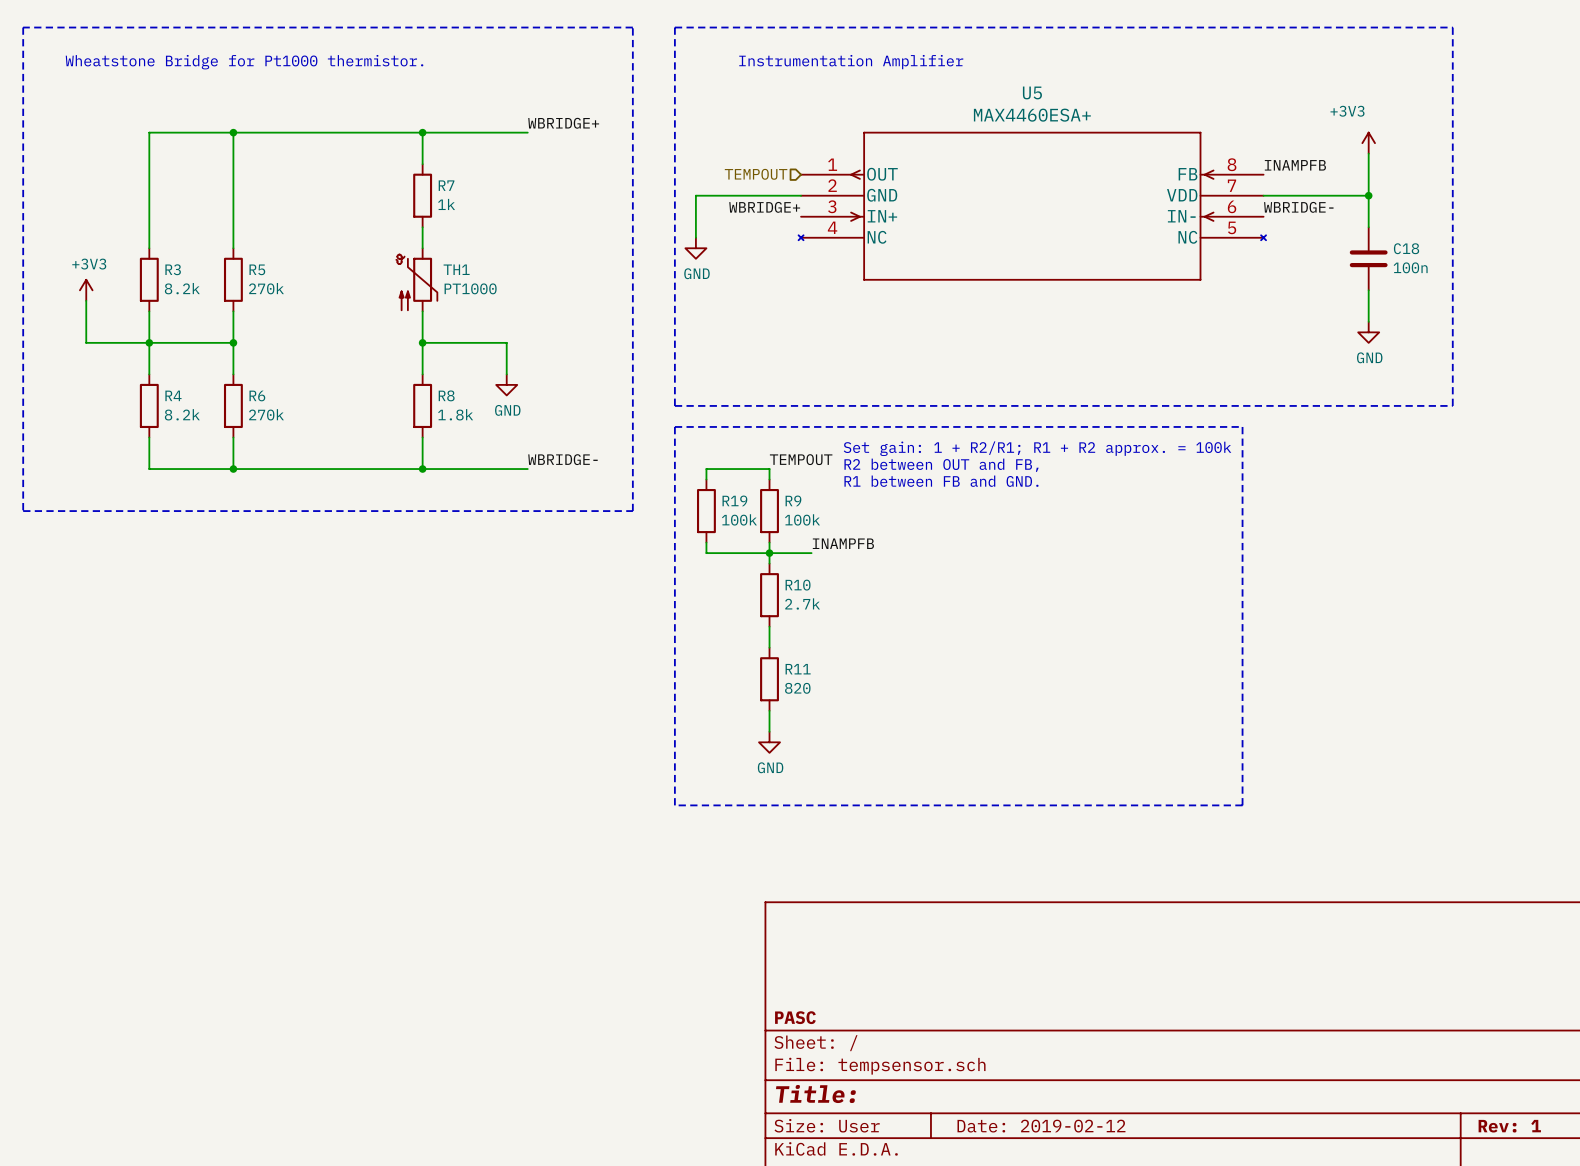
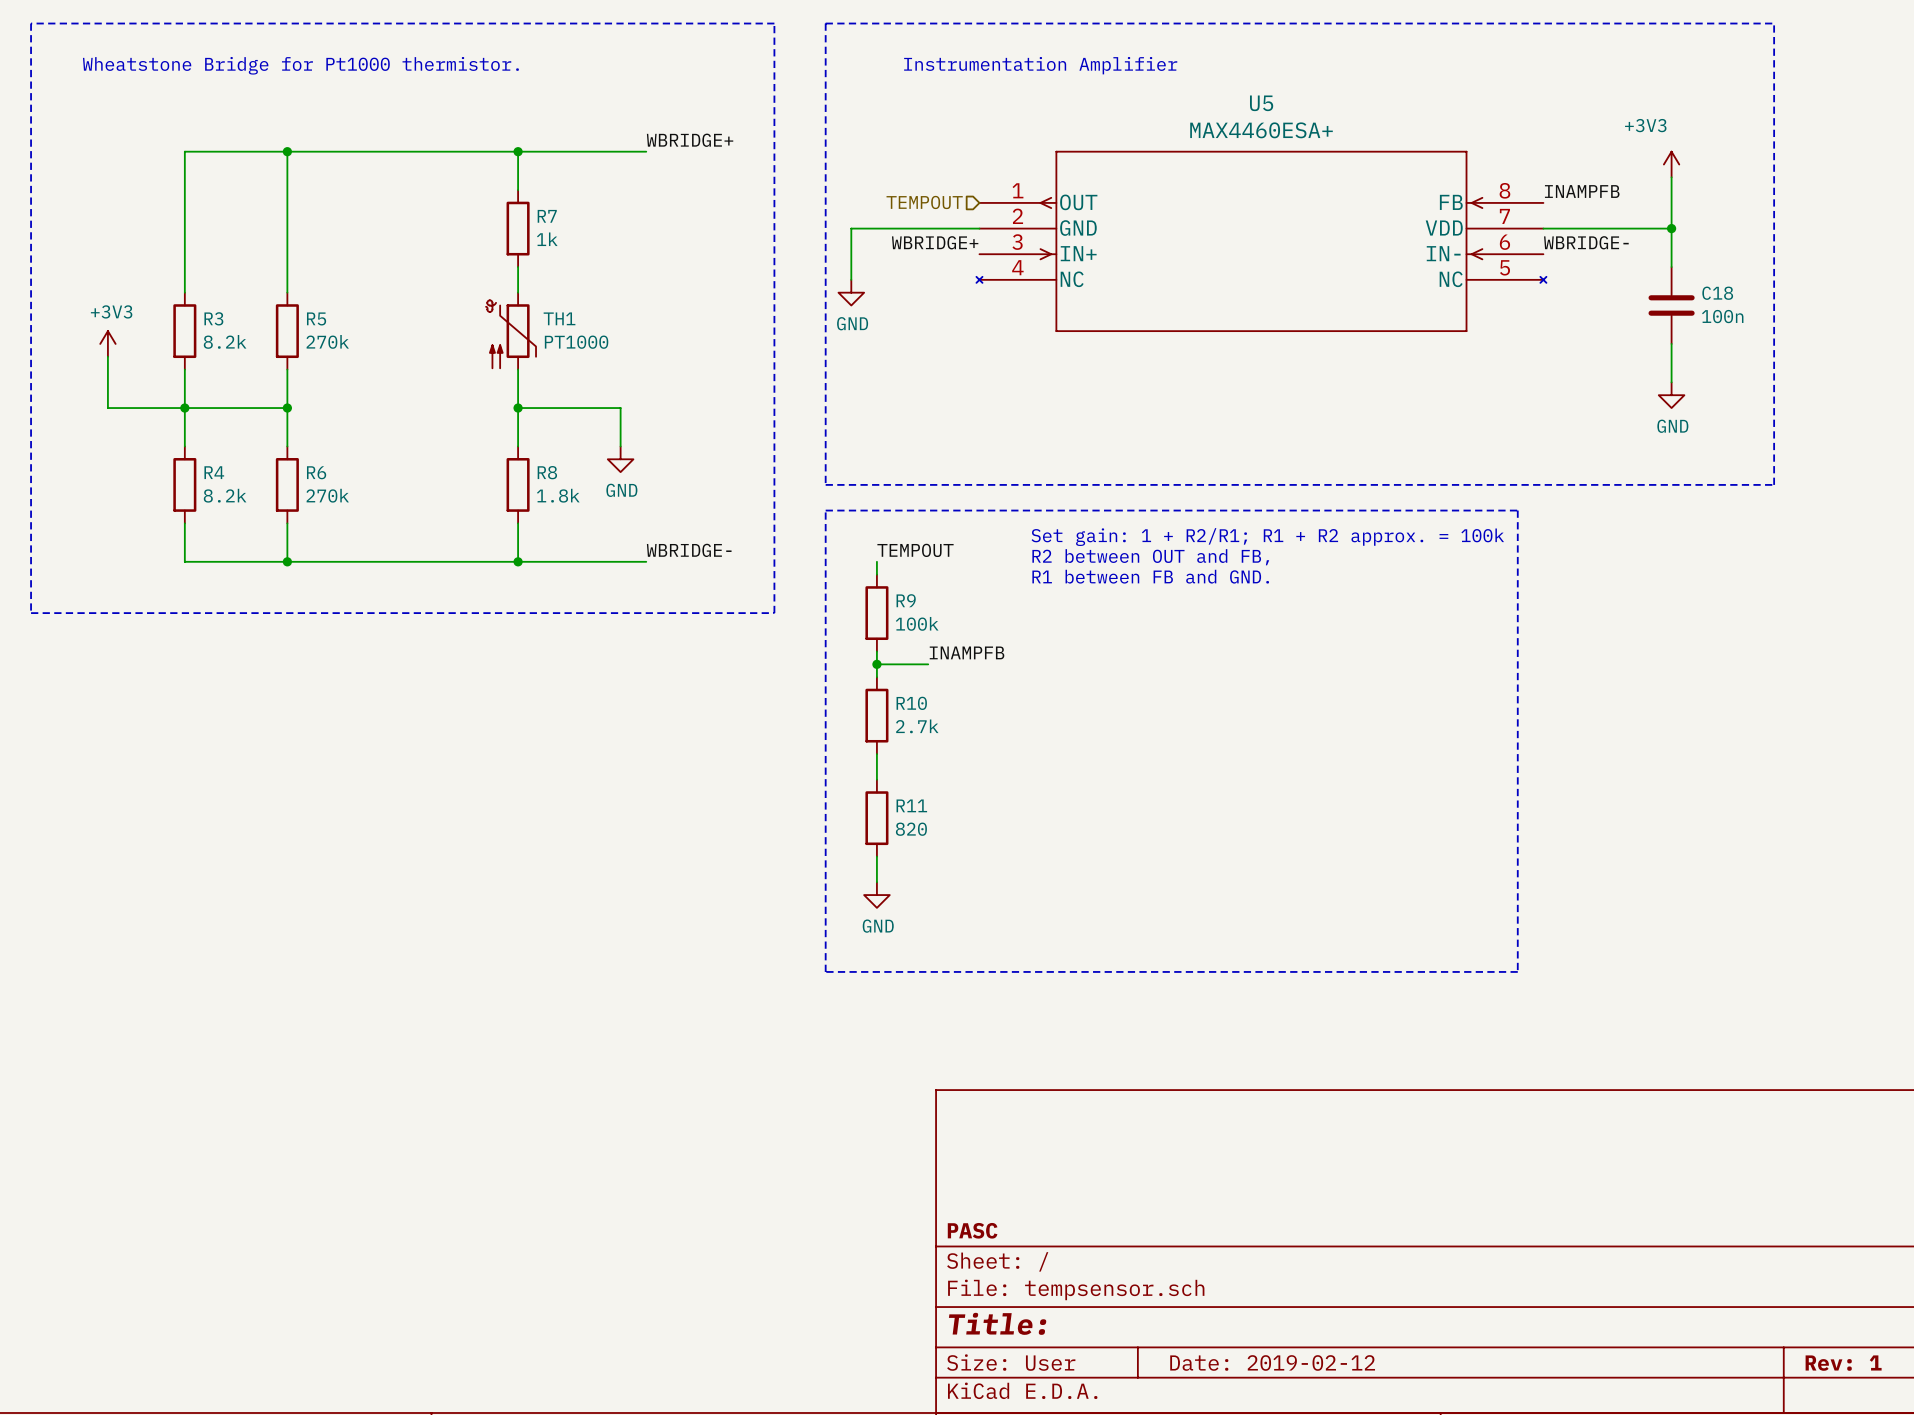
label position: TEMPOUT (801, 459) -> TEMPOUT (915, 550)
wire: none -> (876, 561) (876, 574)
wire: (706, 479) (706, 469) (769, 469) (769, 479) -> none
R19: 100k (706, 511) -> none
R9 position: (769, 511) -> (876, 613)
wire: (706, 542) (706, 553) (716, 553) -> none
wire: (769, 542) (769, 563) -> (876, 651) (876, 677)
label position: INAMPFB (843, 543) -> INAMPFB (967, 652)
junction: none -> (876, 664)
wire: (759, 553) (811, 553) -> none
junction: (769, 553) -> none
R10 position: (769, 595) -> (876, 715)
wire: (769, 626) (769, 647) -> (876, 754) (876, 779)
R11 position: (769, 679) -> (876, 818)
wire: (769, 710) (769, 731) -> (876, 856) (876, 882)
power symbol position: GND (769, 742) -> GND (876, 895)

